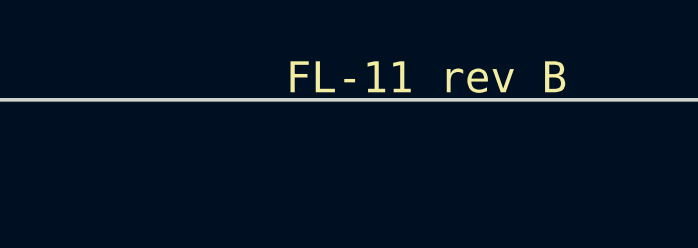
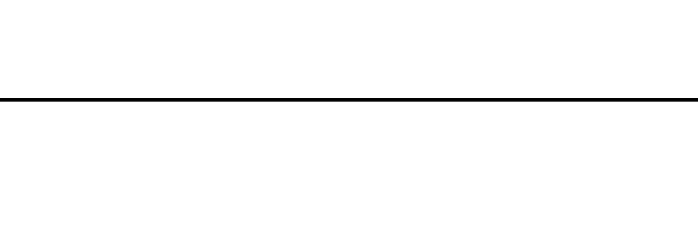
text: FL-11 rev B (427, 77) -> none

